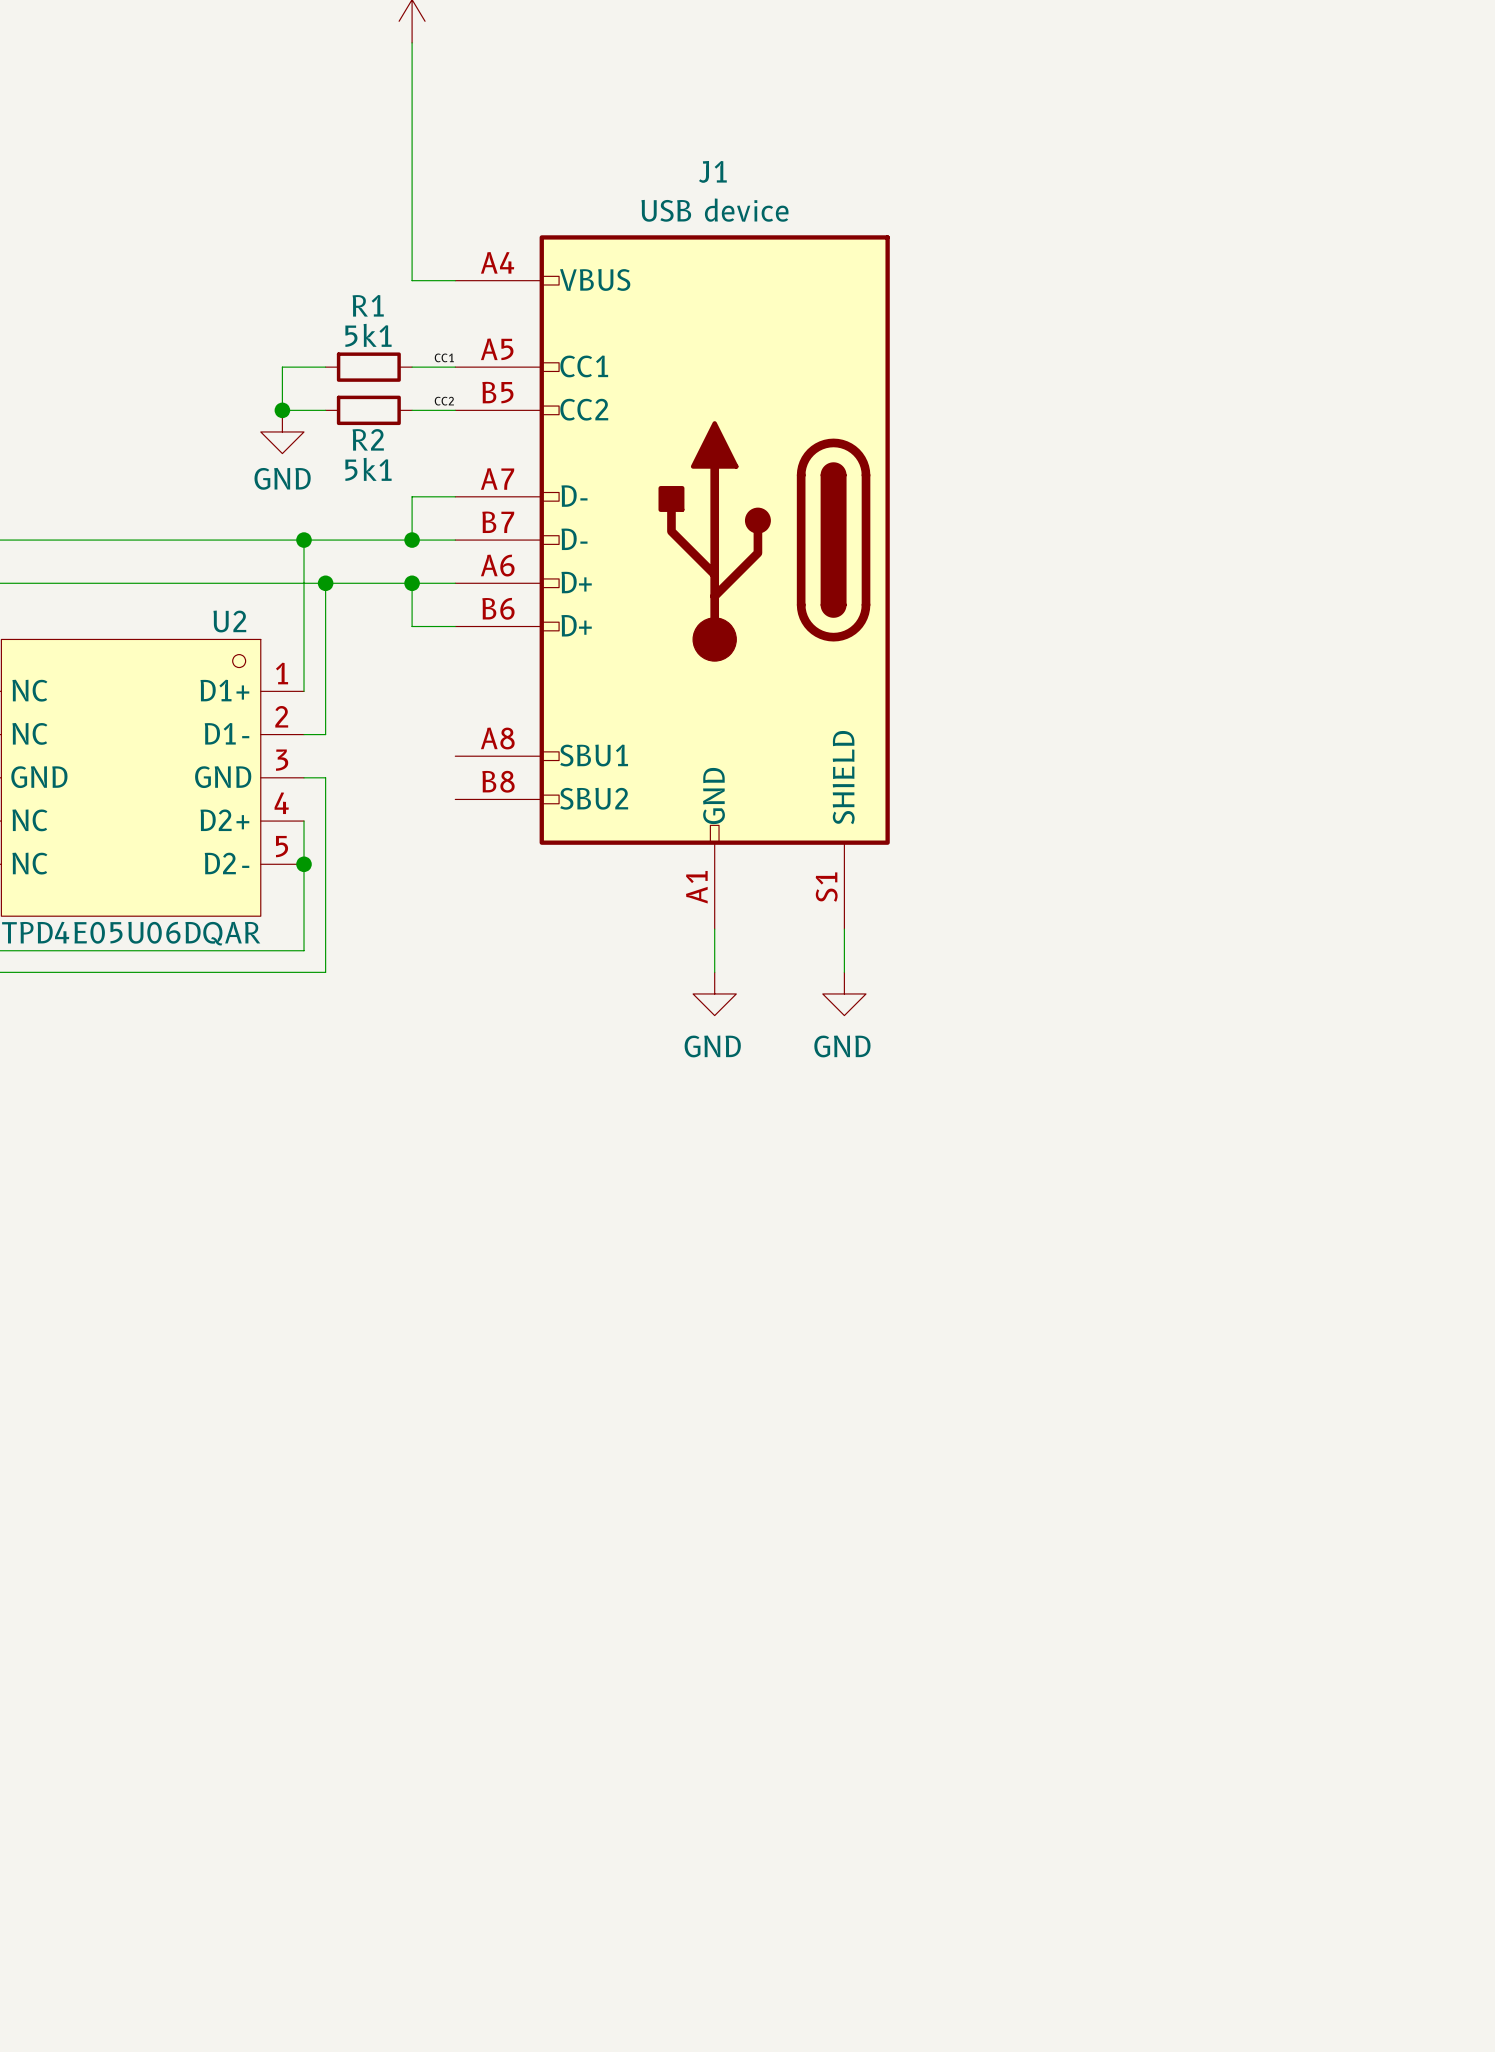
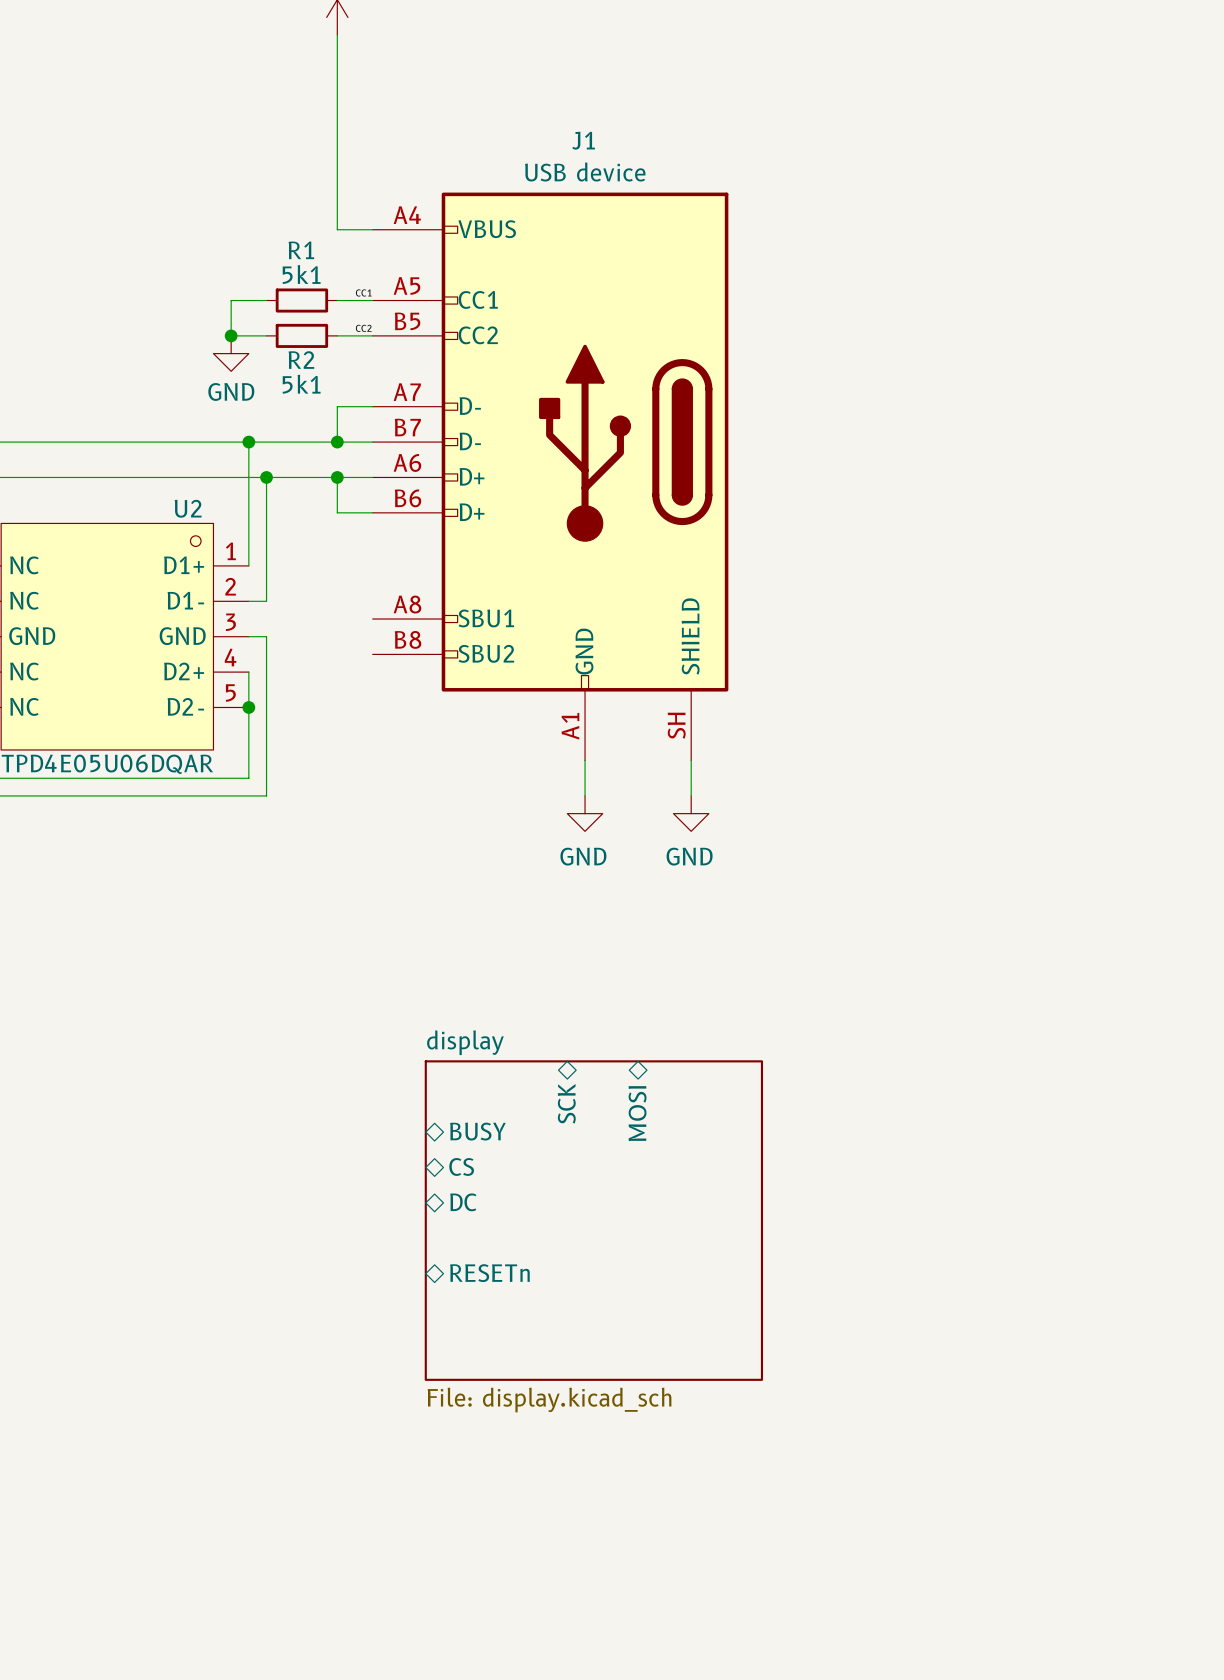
J1 pin number: S1 (826, 887) -> SH (676, 725)
sheet pin: none -> SCK (566, 1103)
sheet pin: none -> MOSI (637, 1113)
sheet pin: none -> BUSY (477, 1131)
sheet pin: none -> CS (461, 1166)
sheet pin: none -> DC (463, 1202)
sheet display: none -> File: display.kicad_sch (593, 1220)
sheet pin: none -> RESETn (489, 1273)

